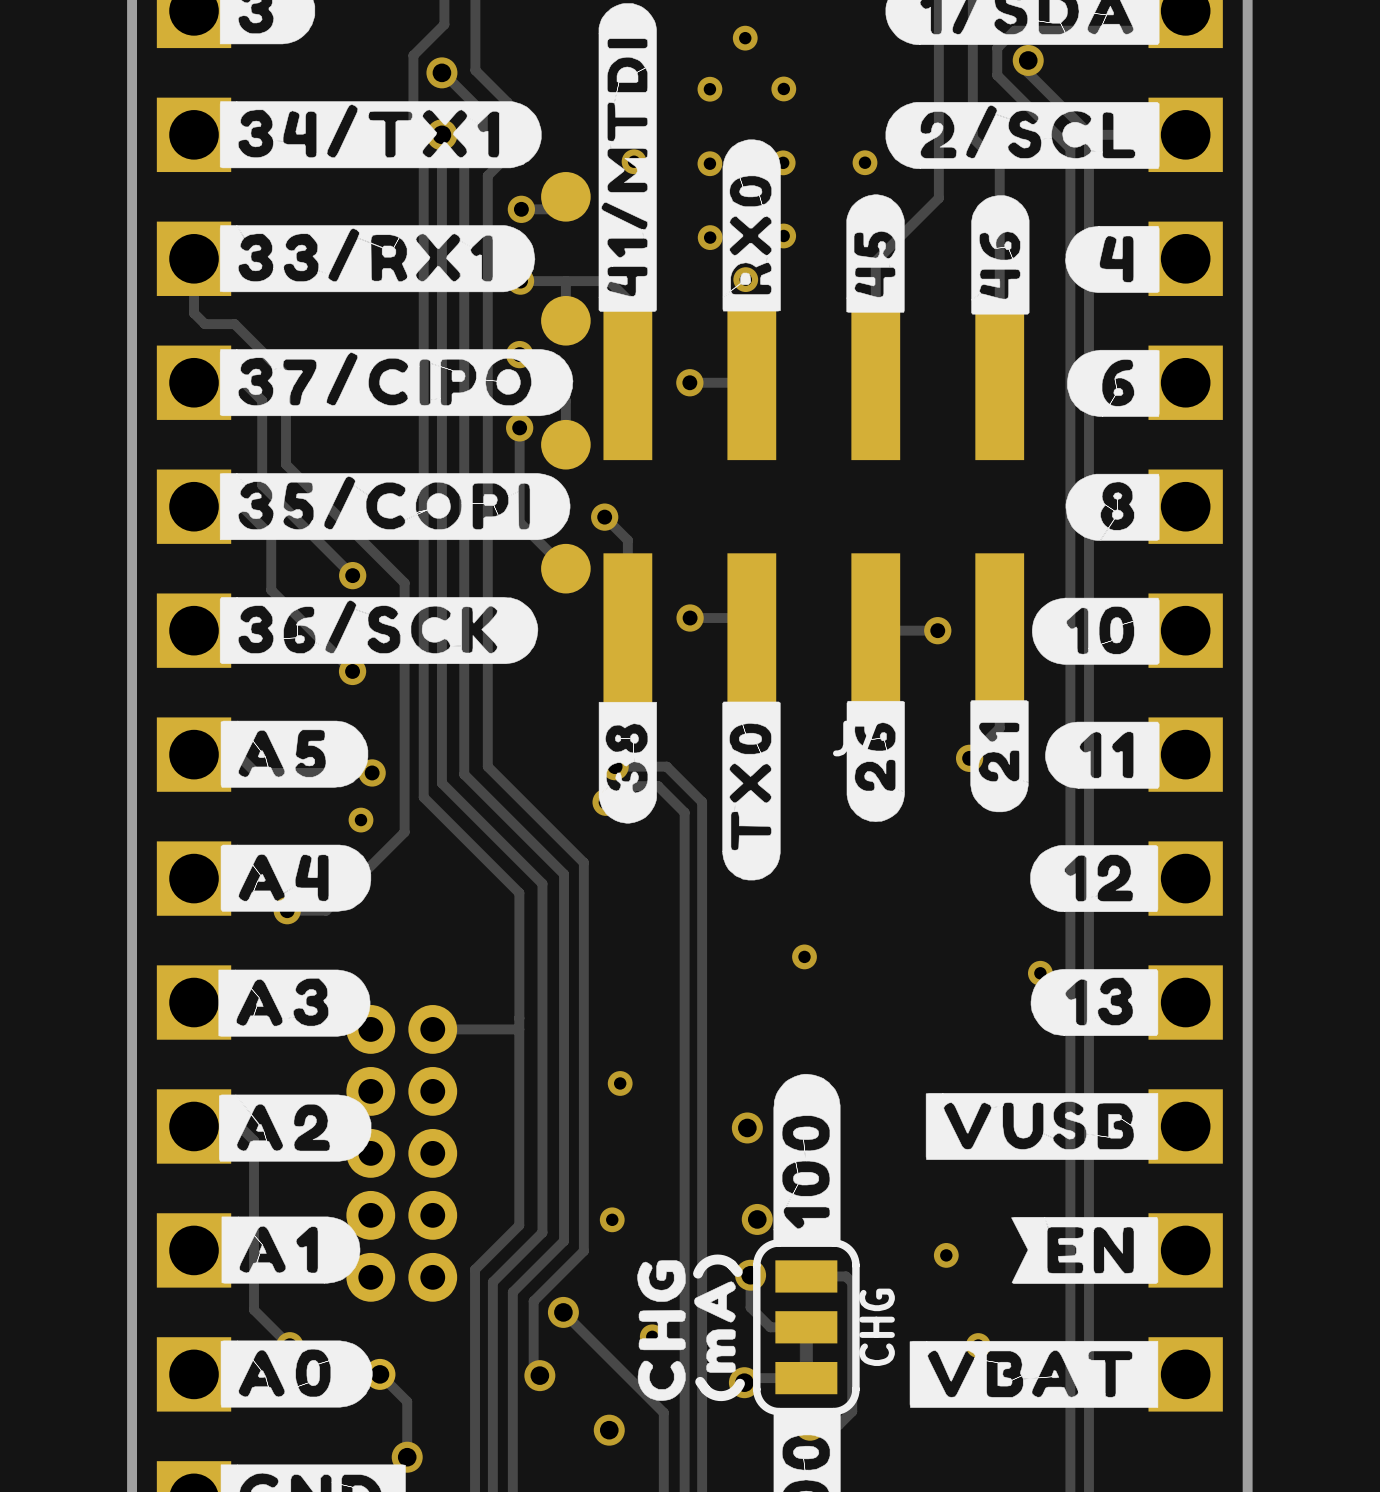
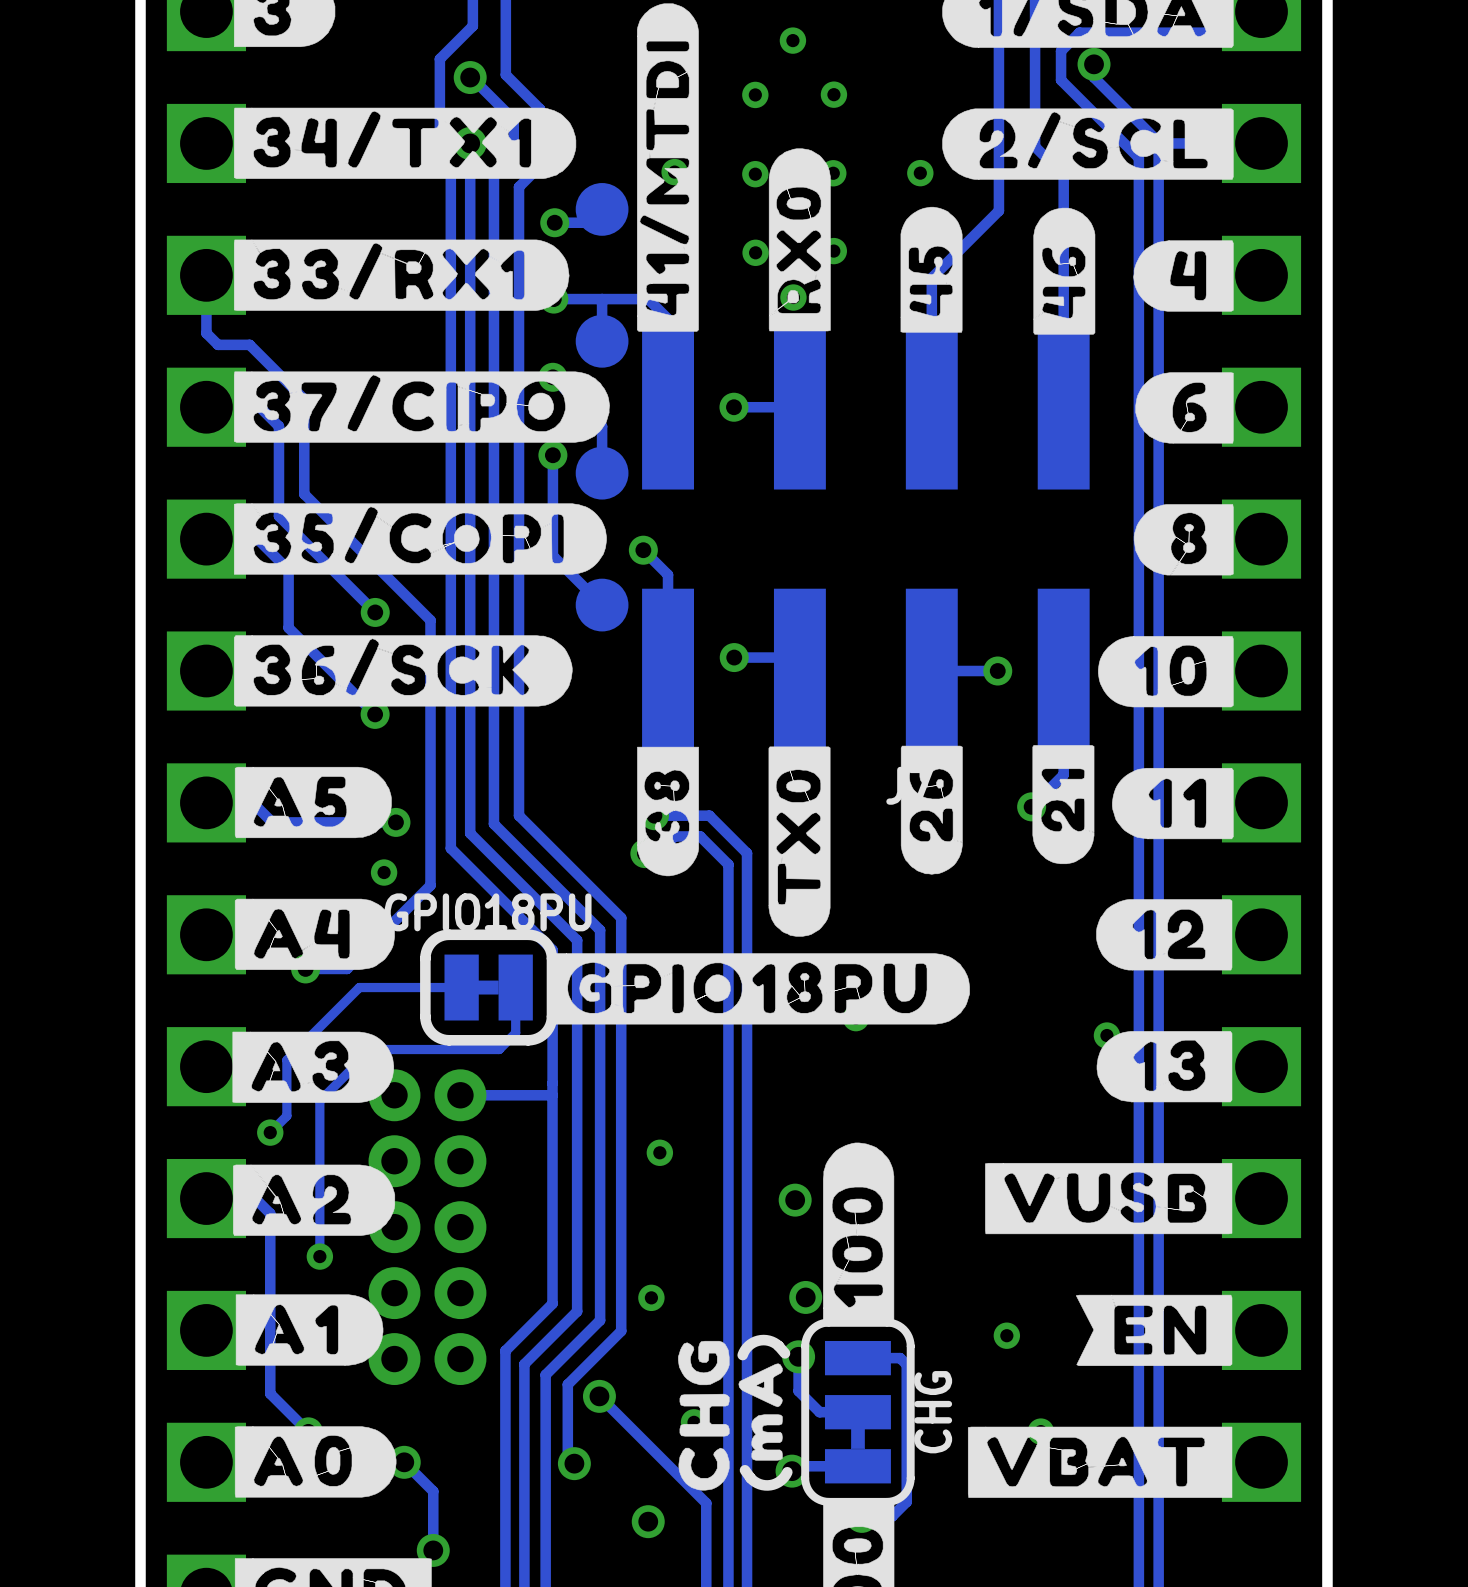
drawing: none -> [548, 953, 970, 1025]
track: none -> (461, 987) (359, 987) (286, 1060) (286, 1115) (270, 1132)
GPIO18PU: none -> (488, 987)
track: none -> (515, 987) (515, 1033) (499, 1049) (371, 1049) (319, 1100) (319, 1256)
via: none -> (270, 1132)
via: none -> (319, 1256)

